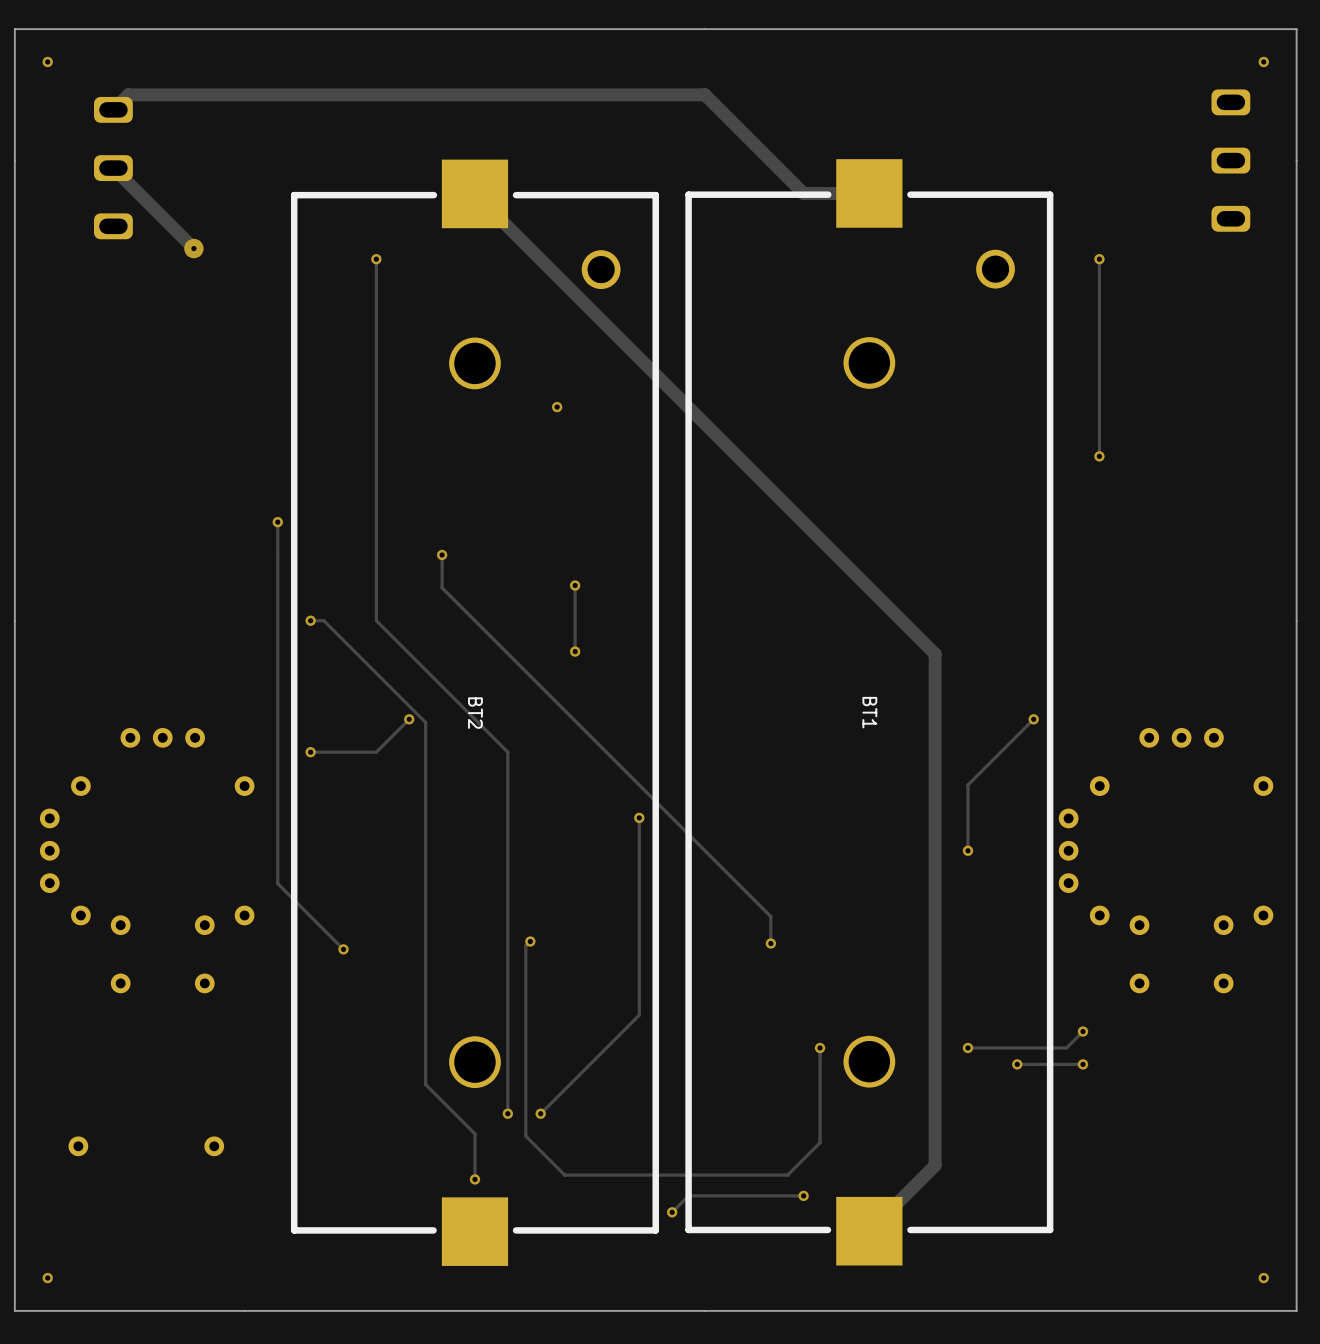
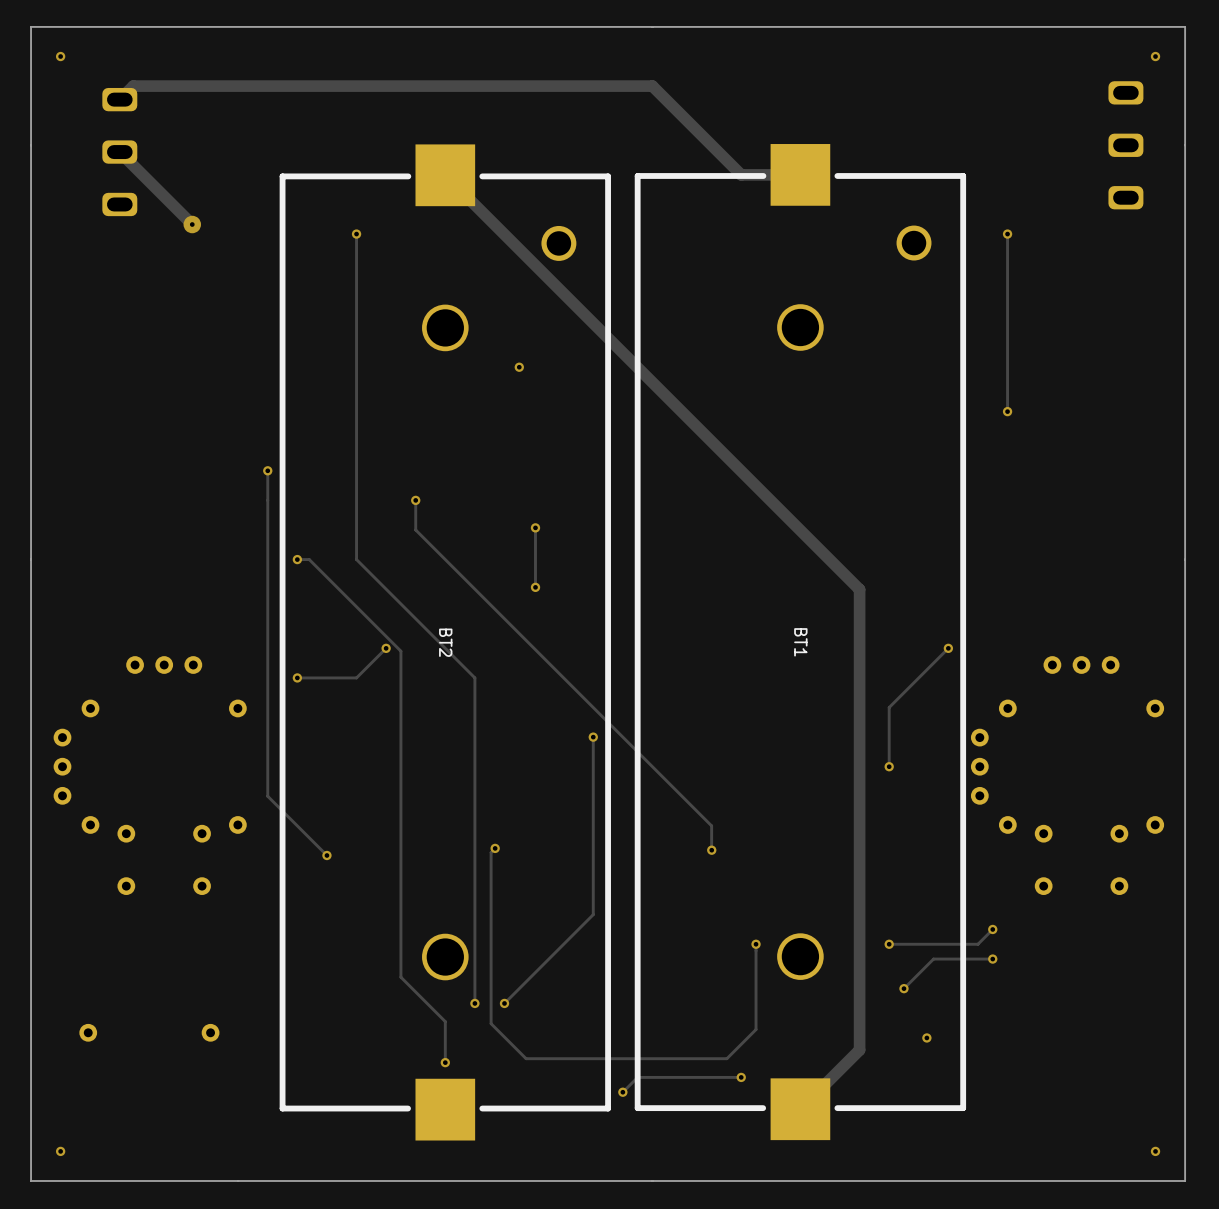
track: none -> (933, 959) (903, 988)
via: (1017, 1064) -> none
via: none -> (903, 988)
via: none -> (926, 1037)

